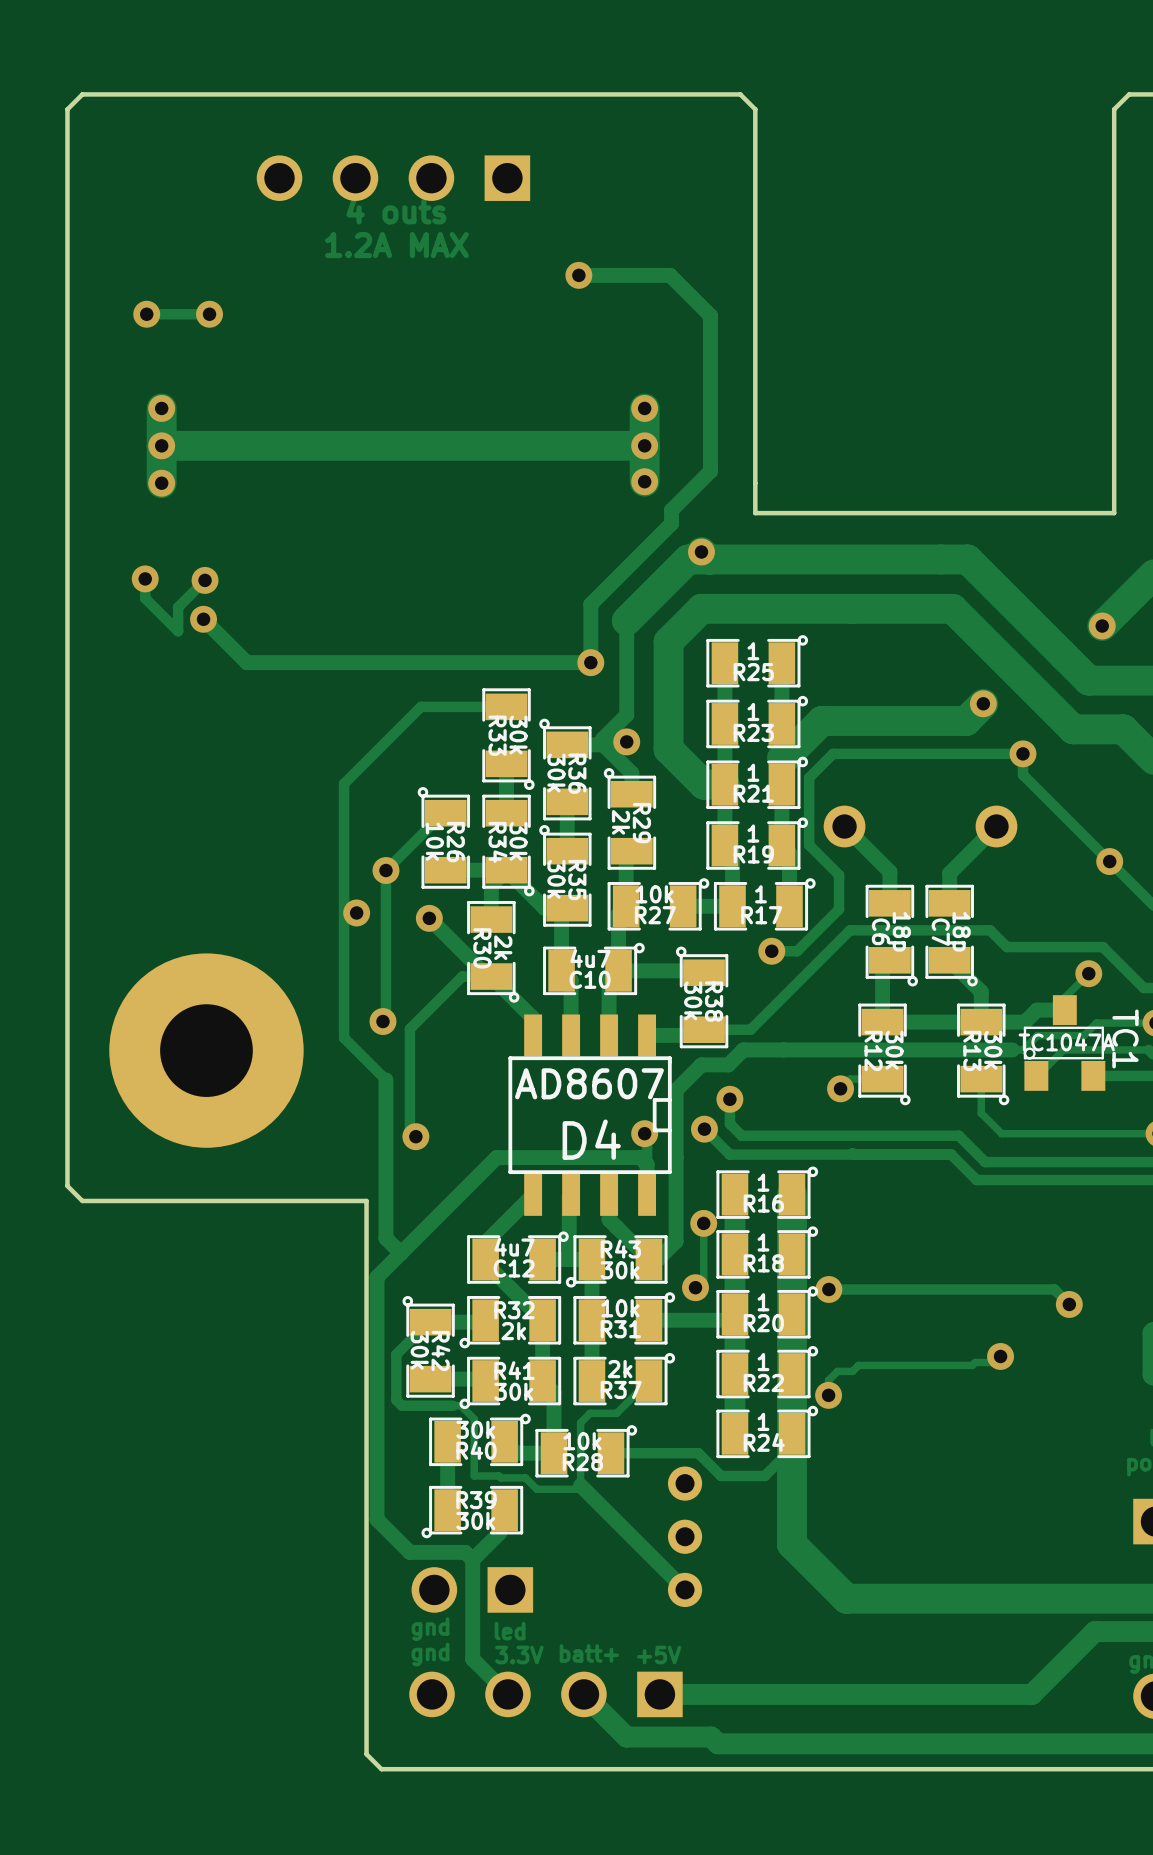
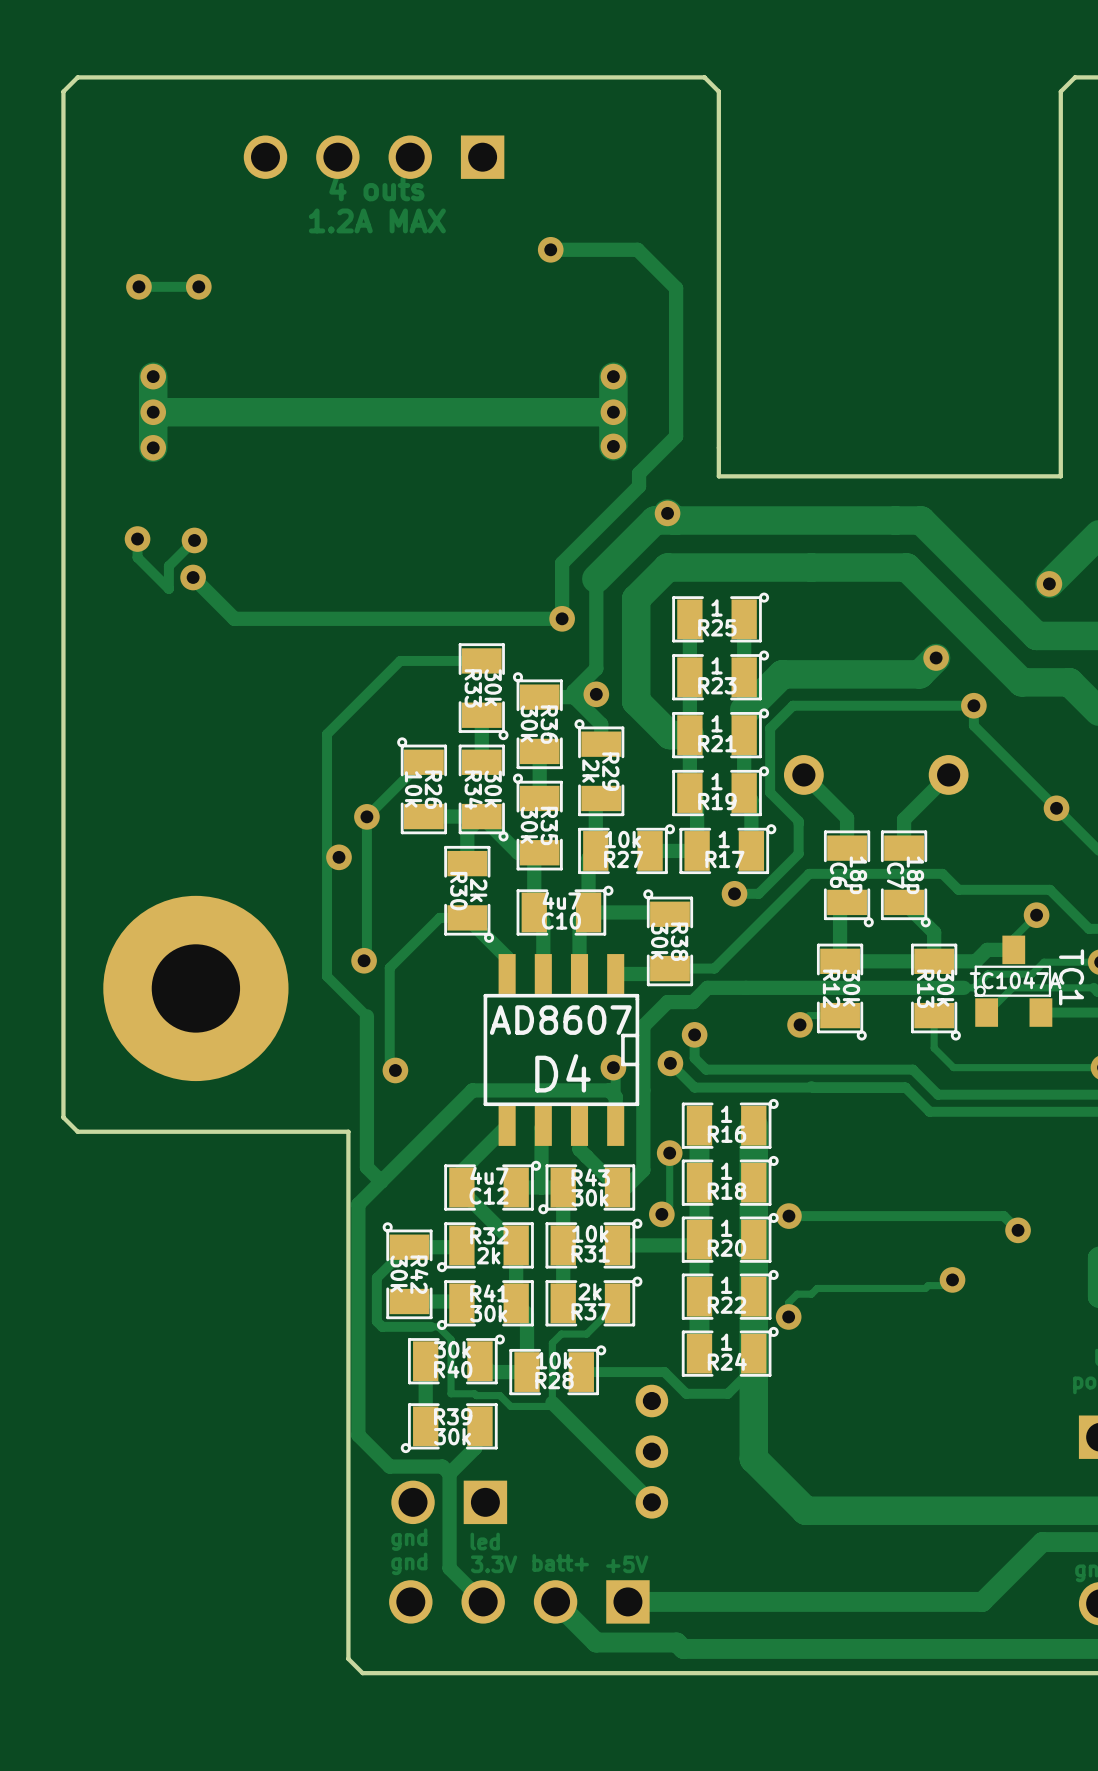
track: (429, 918) (487, 976) (491, 976) -> none
via: (429, 918) -> none

